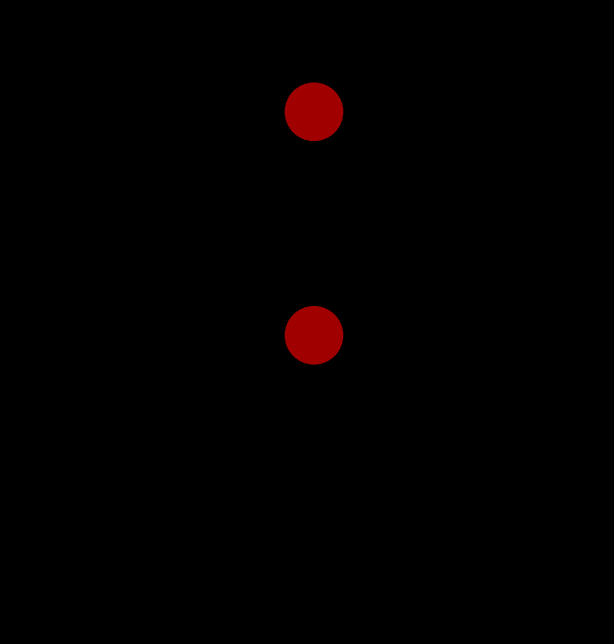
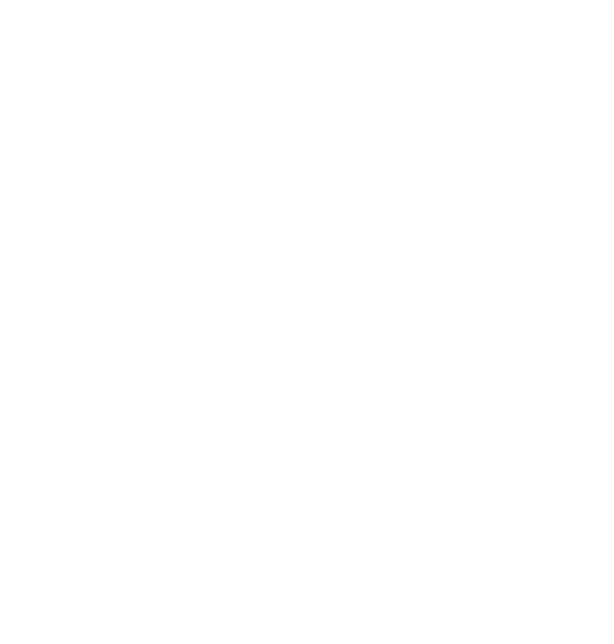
part: (313, 111) -> none
part: (313, 335) -> none

